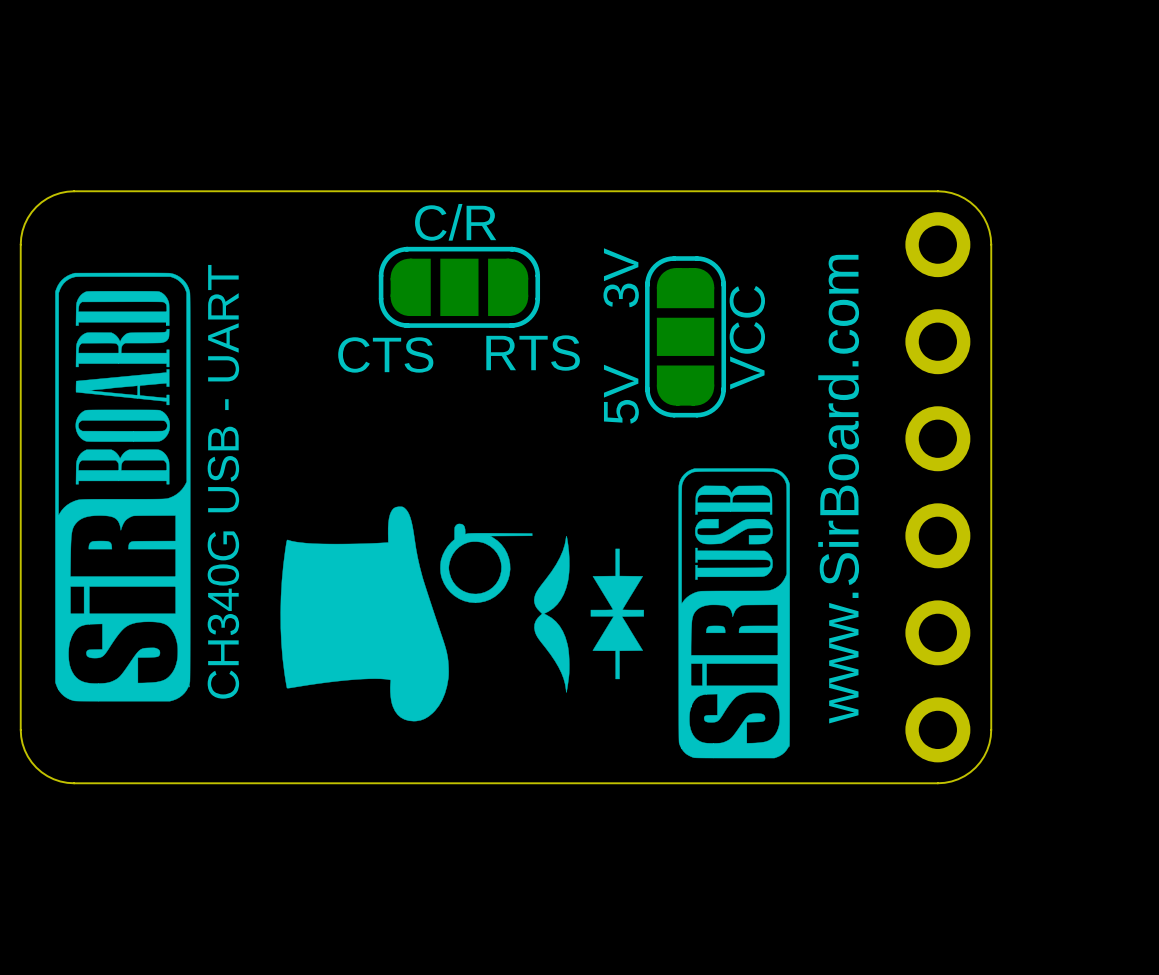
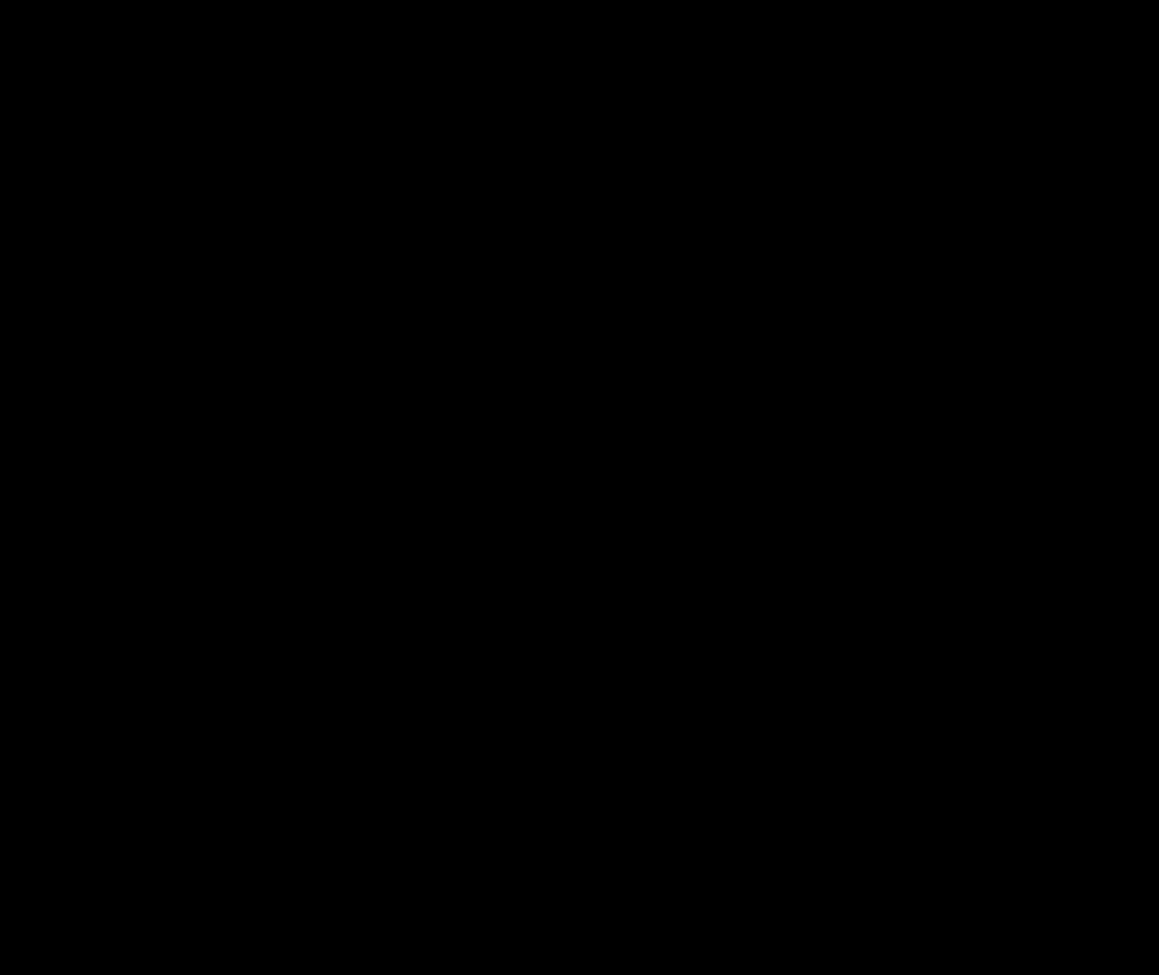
board edge: (937, 191) (74, 191) (60, 193) (47, 198) (36, 206) (27, 217) (22, 230) (20, 244) (20, 729) (22, 743) (27, 756) (36, 767) (47, 776) (60, 781) (74, 783) (937, 783) (951, 781) (964, 776) (975, 767) (984, 756) (989, 743) (991, 729) (991, 244) (987, 224) (975, 206) (958, 195) (937, 191) -> none
text: C/R (455, 222) -> none
drawing: [55, 272, 191, 702] -> none
text: 3V (621, 277) -> none
part: (459, 287) -> none
part: (685, 336) -> none
text: VCC (747, 337) -> none
text: RTS (533, 353) -> none
text: CTS (385, 354) -> none
text: 5V (621, 394) -> none
drawing: [280, 468, 790, 759] -> none
text: CH340G USB - UART (223, 481) -> none
part: (937, 487) -> none
text: www.SirBoard.com (838, 489) -> none

